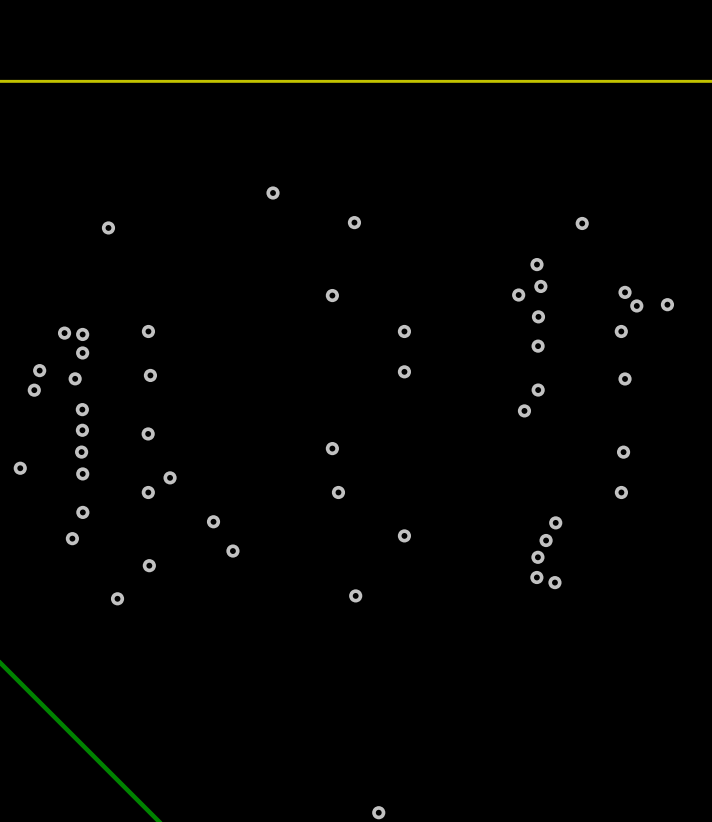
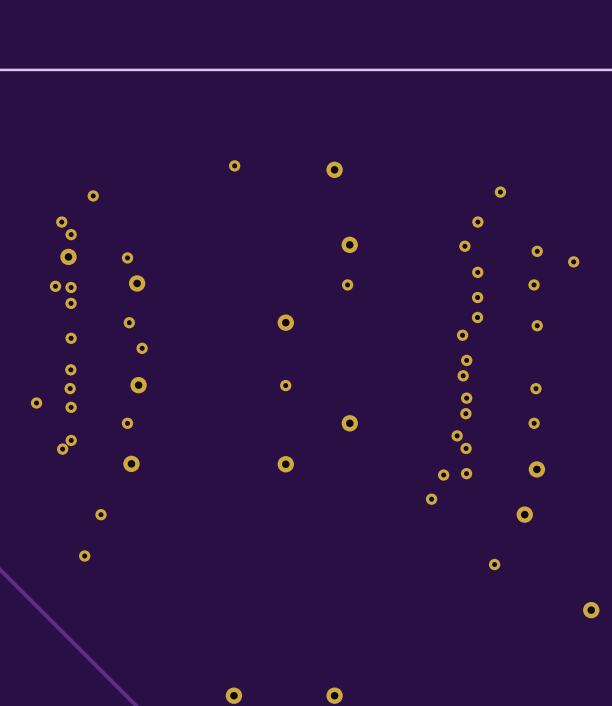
via: none -> (334, 169)
via: (354, 222) -> none
via: none -> (61, 222)
via position: (536, 264) -> (477, 222)
via: none -> (71, 234)
via: none -> (349, 244)
via: (332, 295) -> none
via: (518, 295) -> none
via: none -> (68, 256)
via: (636, 305) -> none
via: (538, 316) -> none
via: none -> (477, 272)
via: none -> (137, 283)
via position: (148, 331) -> (127, 257)
via: (538, 346) -> none
via: none -> (477, 297)
via: none -> (477, 317)
via: (39, 370) -> none
via: (404, 371) -> none
via: none -> (285, 322)
via: (75, 378) -> none
via: (34, 390) -> none
via: none -> (71, 338)
via: (82, 409) -> none
via: (524, 410) -> none
via: none -> (466, 360)
via position: (148, 433) -> (142, 348)
via: none -> (463, 375)
via: none -> (138, 385)
via: none -> (466, 398)
via position: (20, 468) -> (36, 403)
via: (170, 477) -> none
via: none -> (465, 413)
via: (338, 492) -> none
via: none -> (349, 423)
via: none -> (457, 435)
via: (213, 521) -> none
via: none -> (466, 448)
via: (555, 522) -> none
via: (404, 535) -> none
via position: (72, 538) -> (62, 449)
via: none -> (131, 463)
via: none -> (285, 464)
via: (546, 540) -> none
via: none -> (536, 469)
via: (232, 551) -> none
via: none -> (466, 473)
via: none -> (443, 475)
via: (537, 557) -> none
via: (149, 565) -> none
via: (536, 577) -> none
via: none -> (431, 499)
via: (554, 582) -> none
via: (355, 595) -> none
via: none -> (524, 514)
via: none -> (84, 556)
via: none -> (494, 564)
via: none -> (591, 610)
via size: [372, 806, 386, 820] -> [326, 687, 343, 704]
via: none -> (233, 695)

